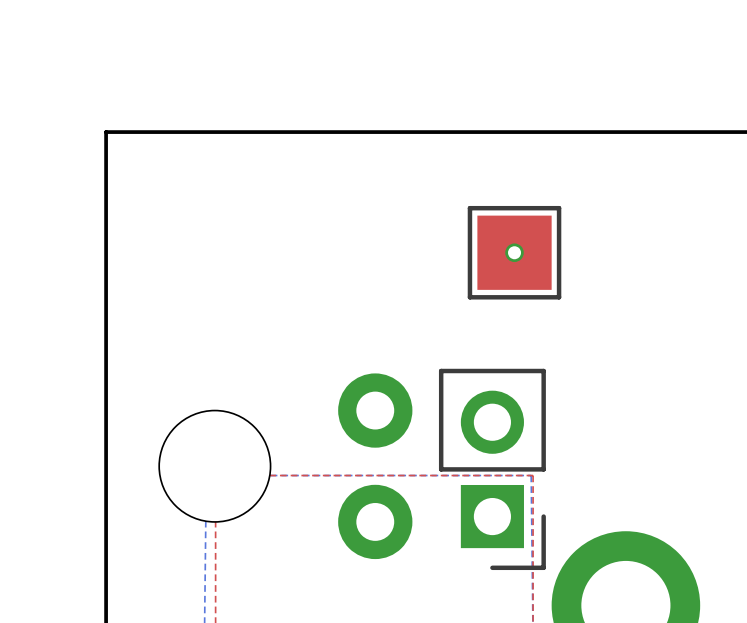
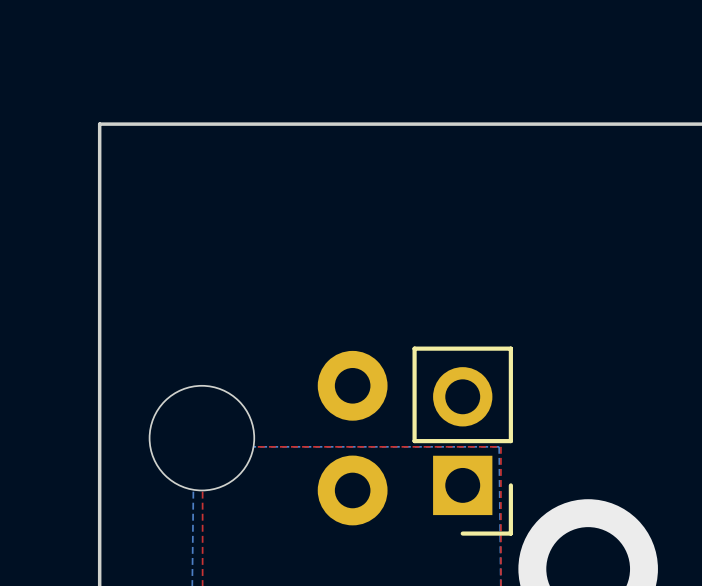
part: (514, 252) -> none
via: (514, 252) -> none

